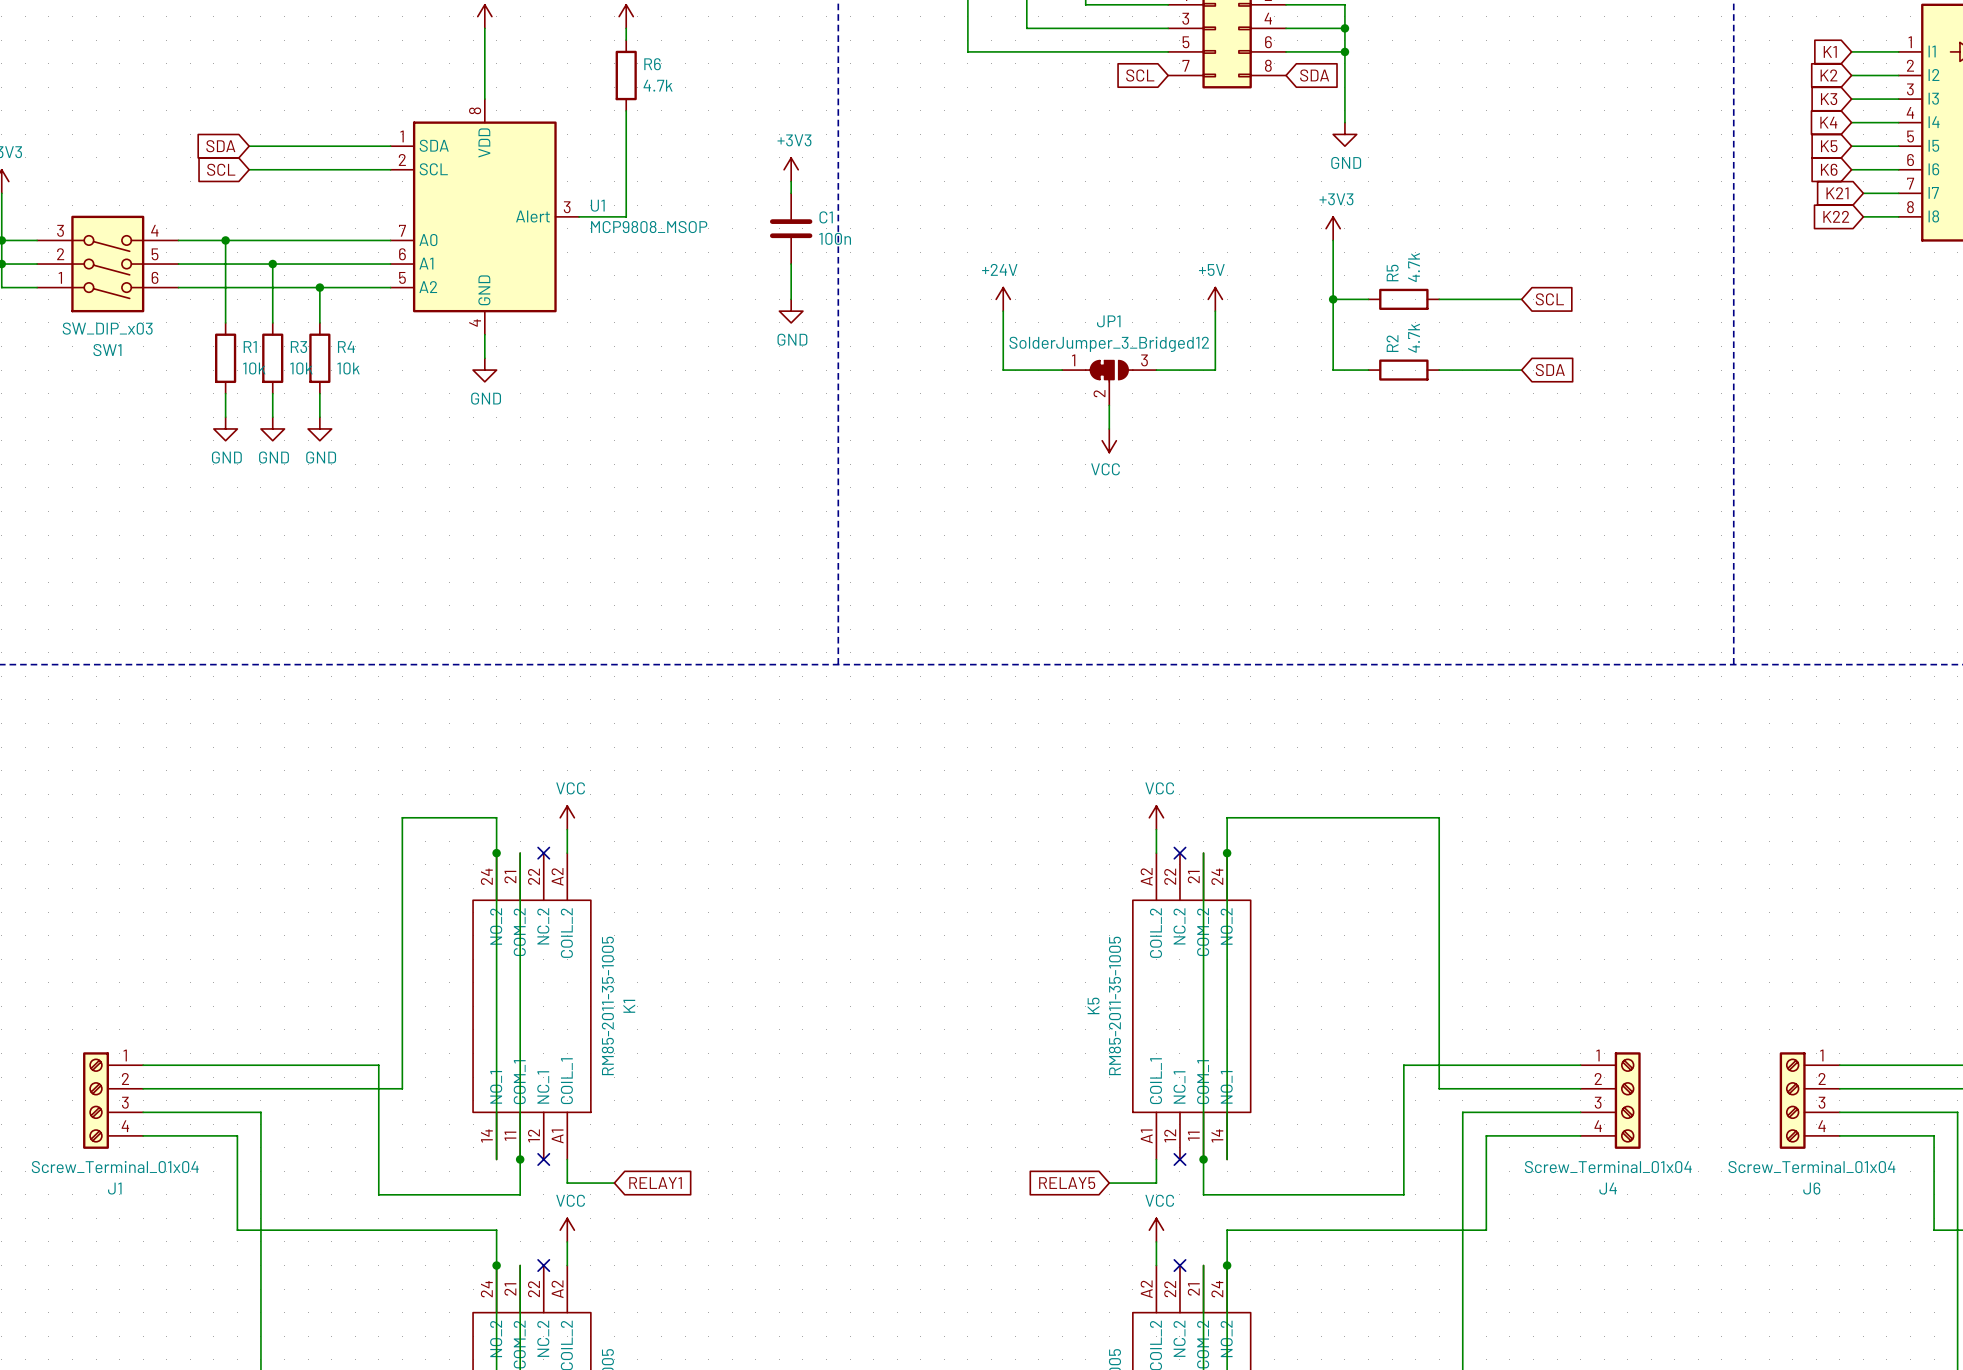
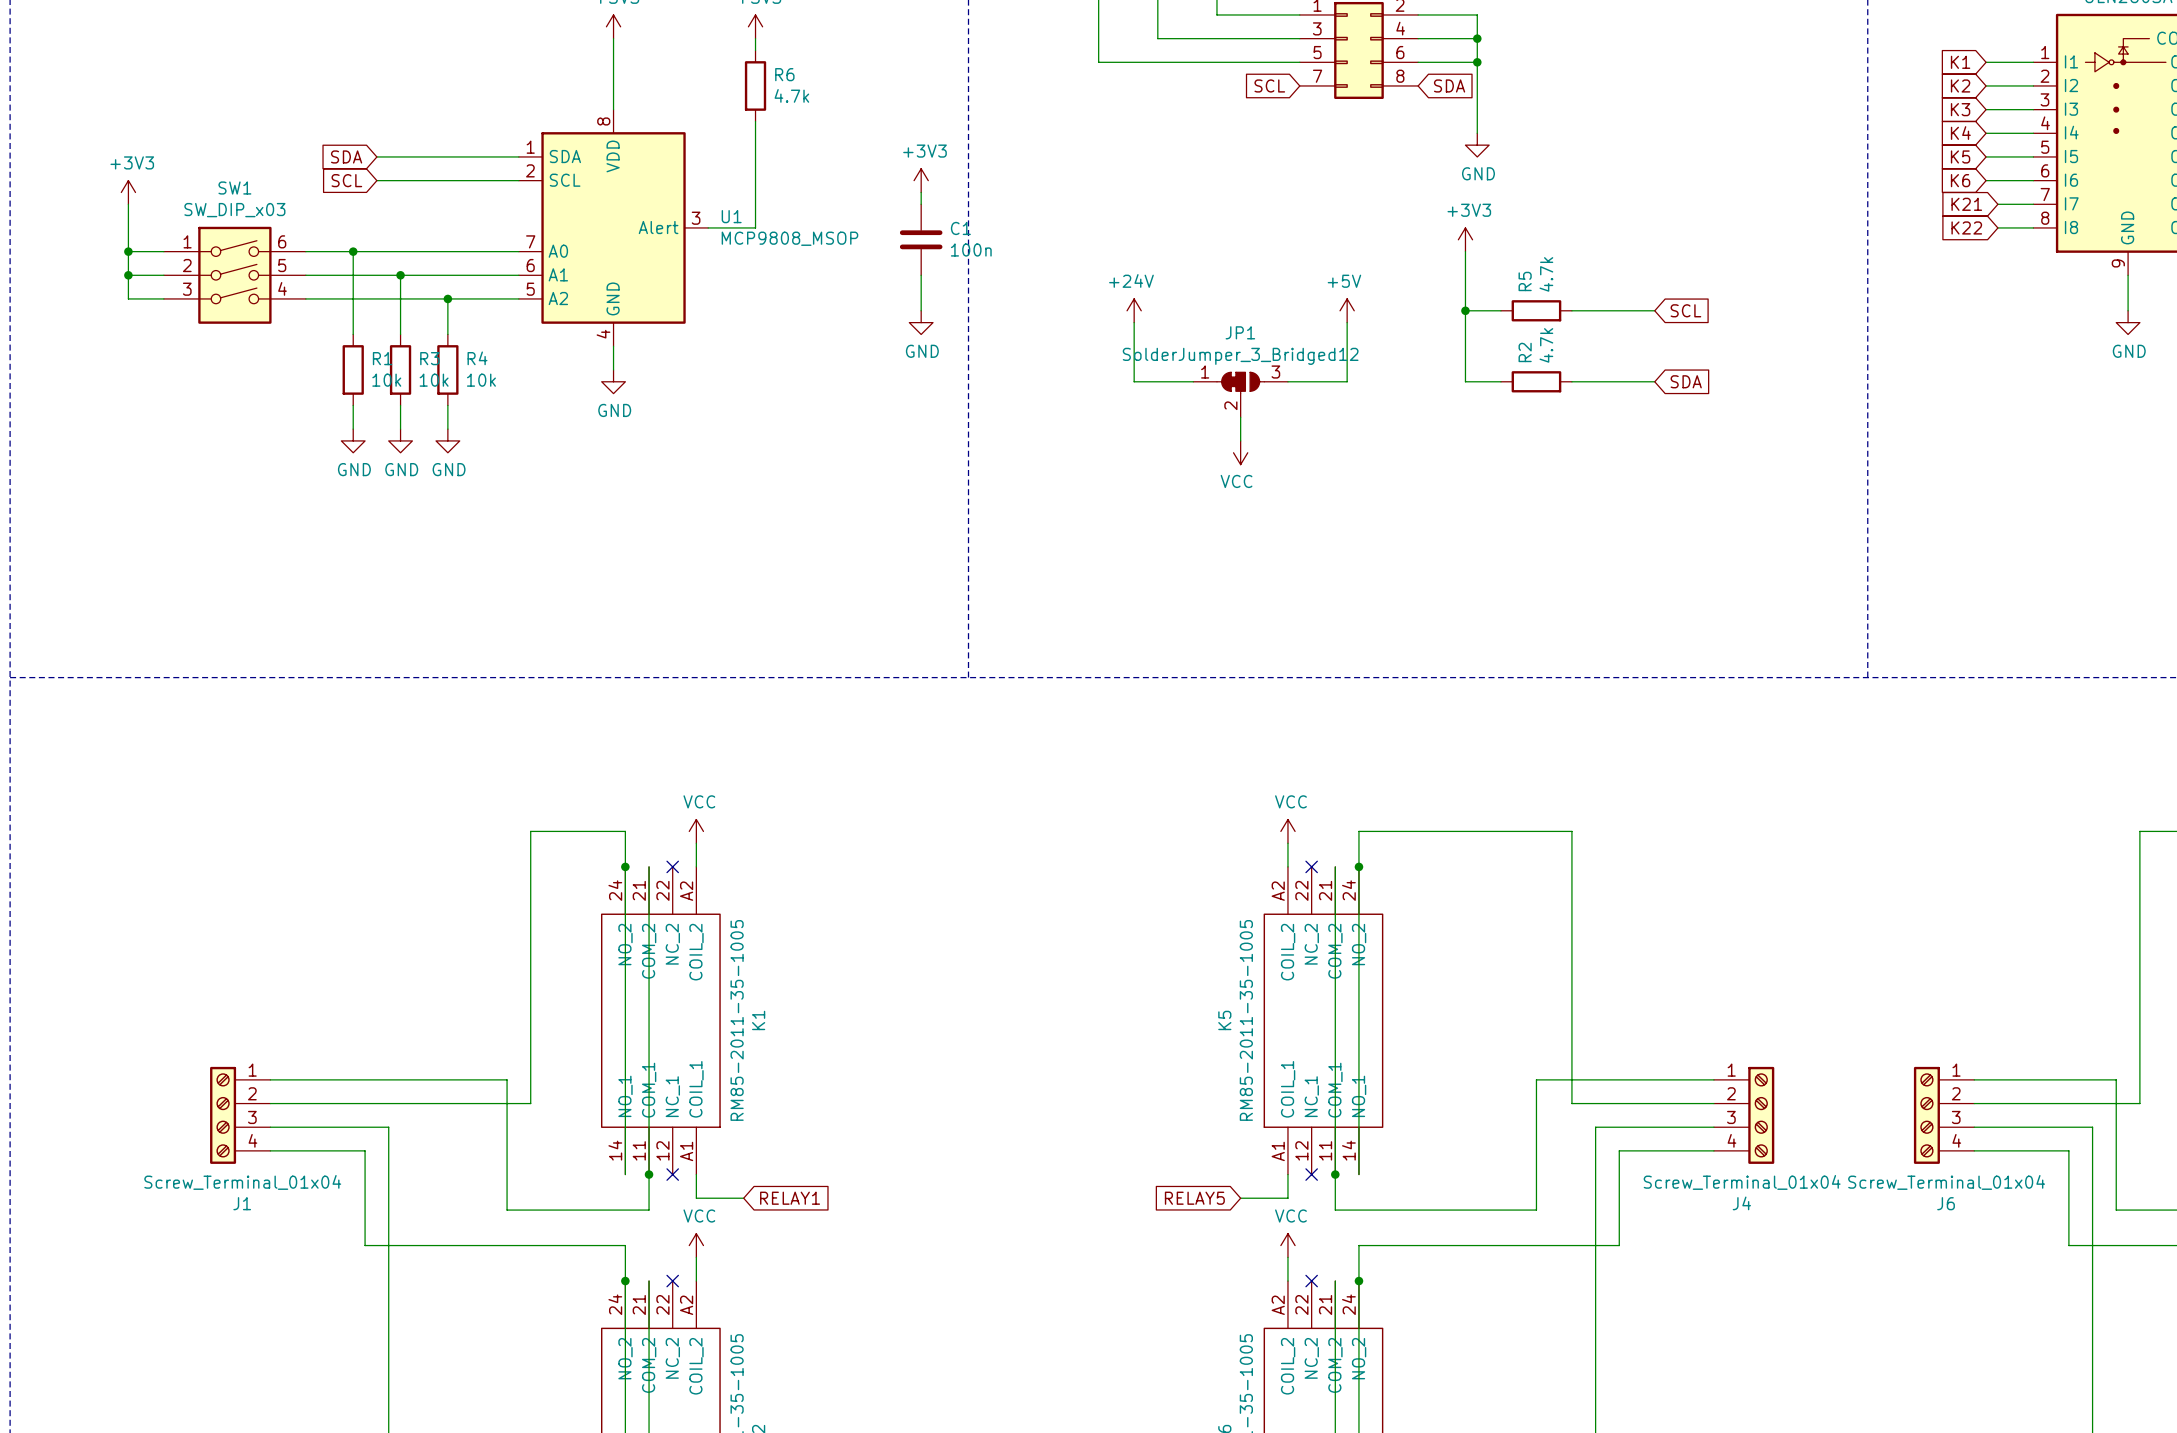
SW1 flip: as is (107, 264) -> up-down (234, 275)

